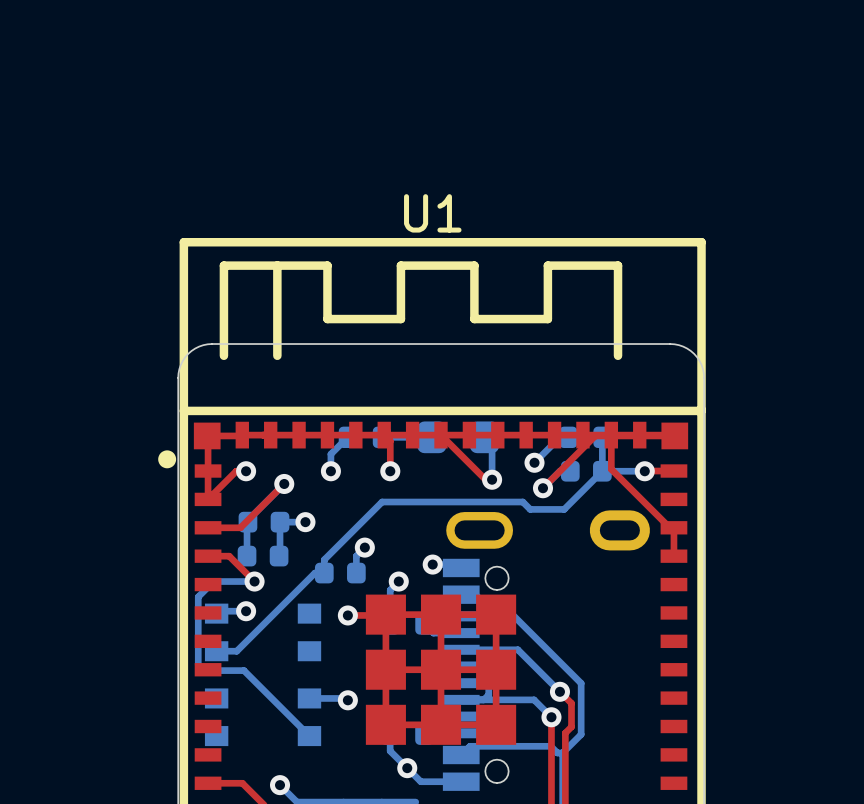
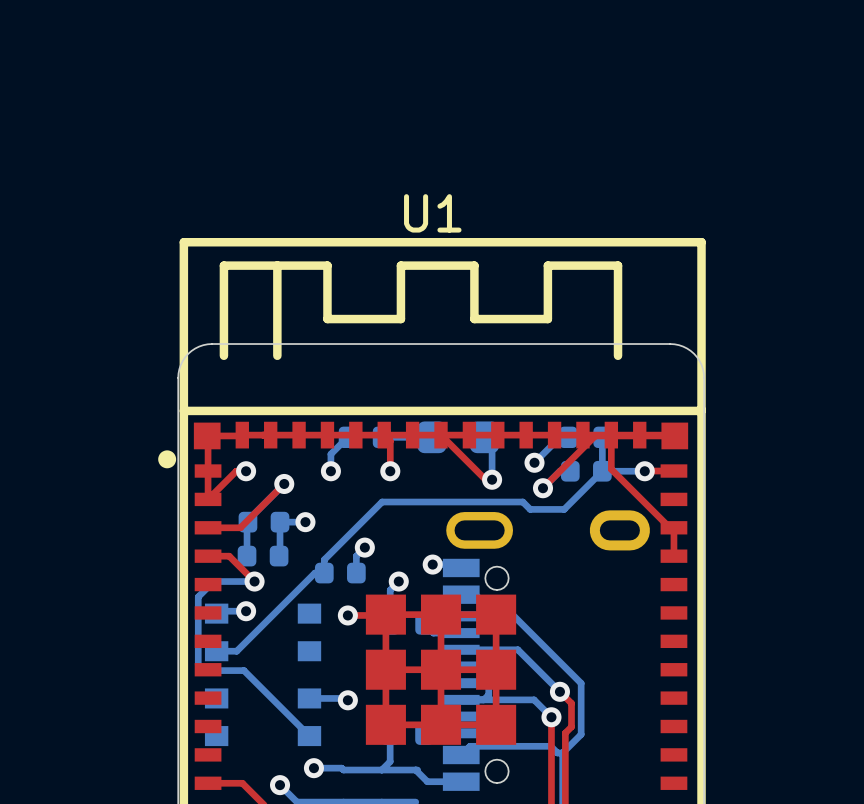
bottom track: (390, 751) (420, 781) (427, 781) -> (415, 770) (427, 781)
bottom track: none -> (390, 751) (390, 761) (381, 770)
bottom track: none -> (313, 768) (417, 770)
via position: (407, 768) -> (313, 768)

